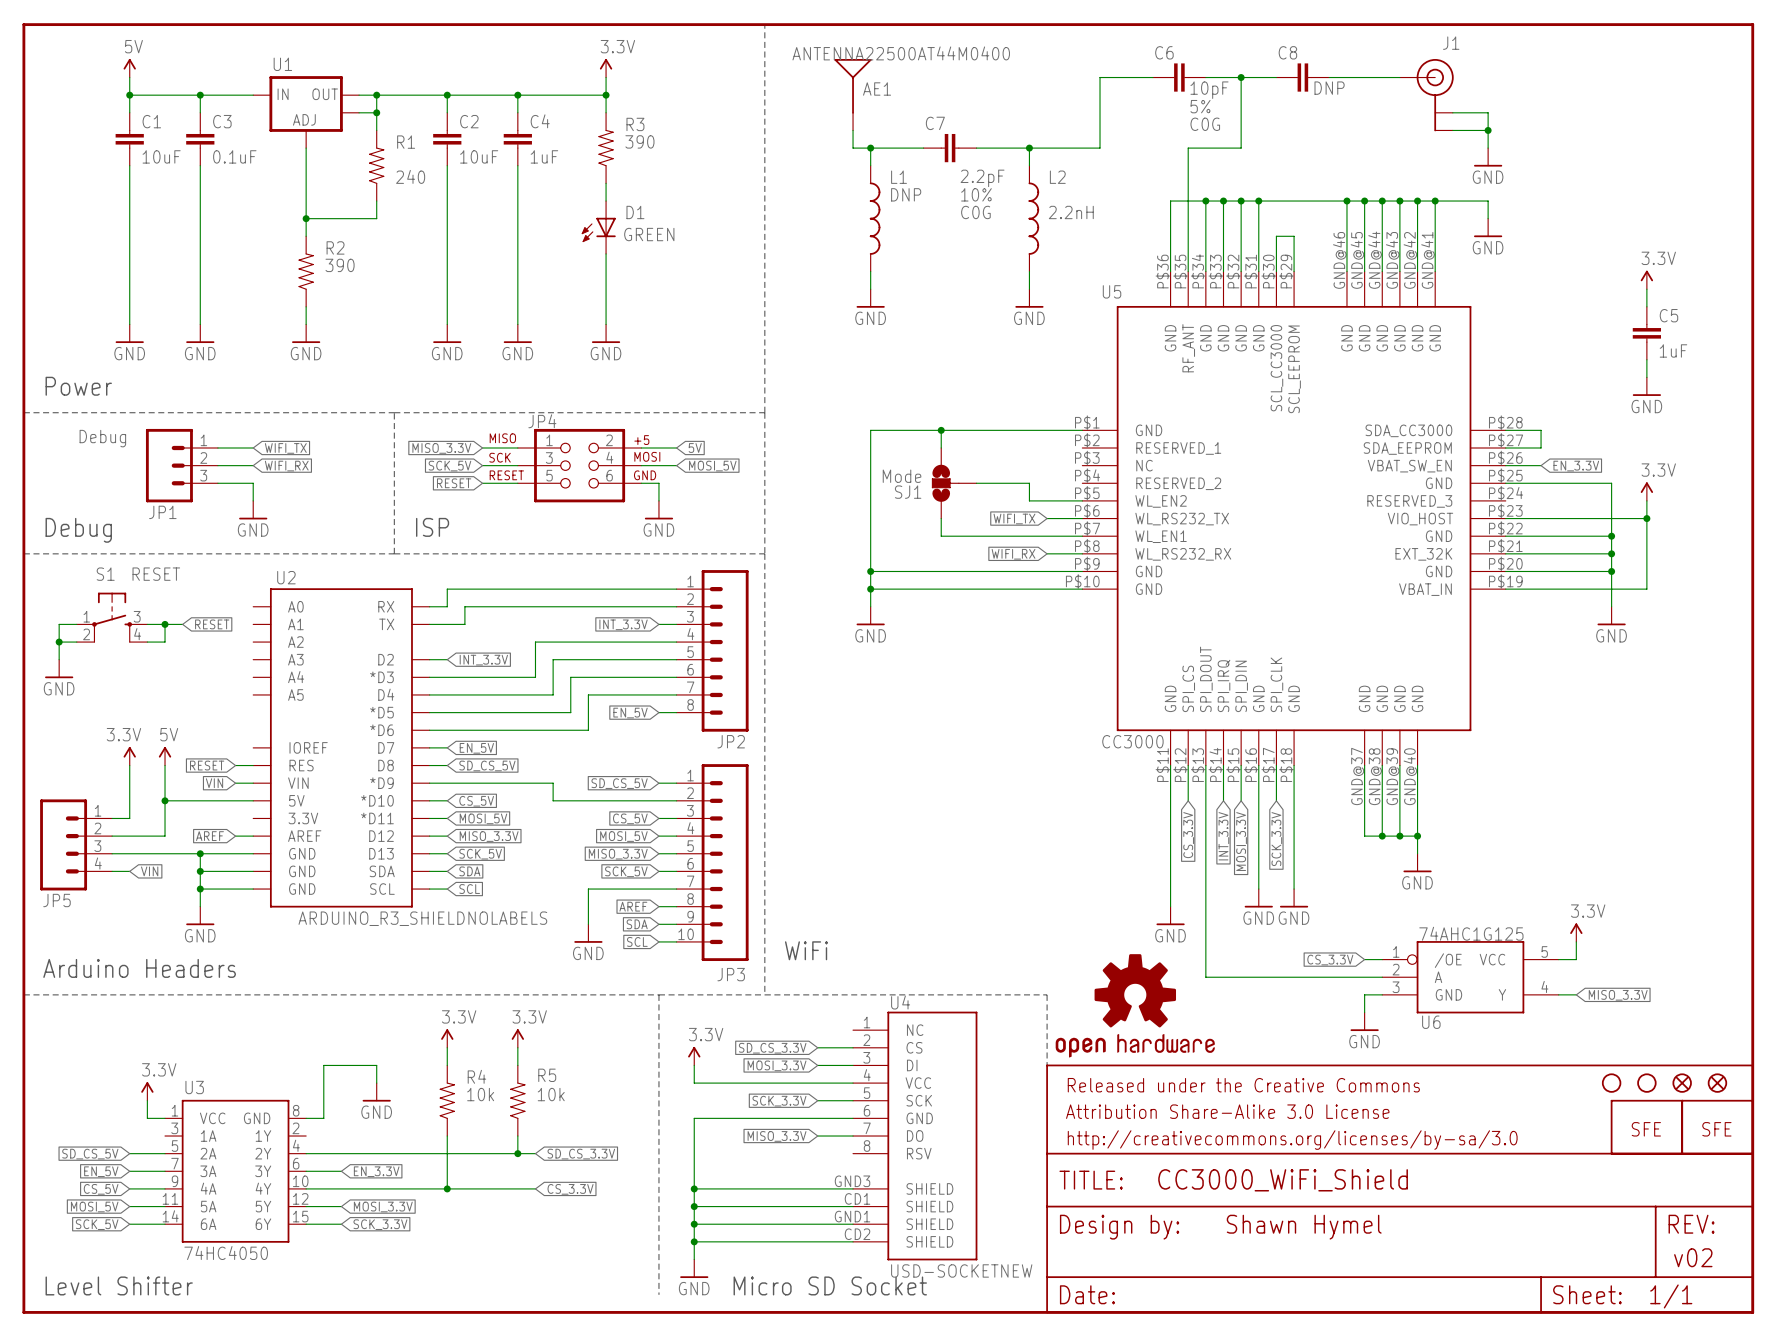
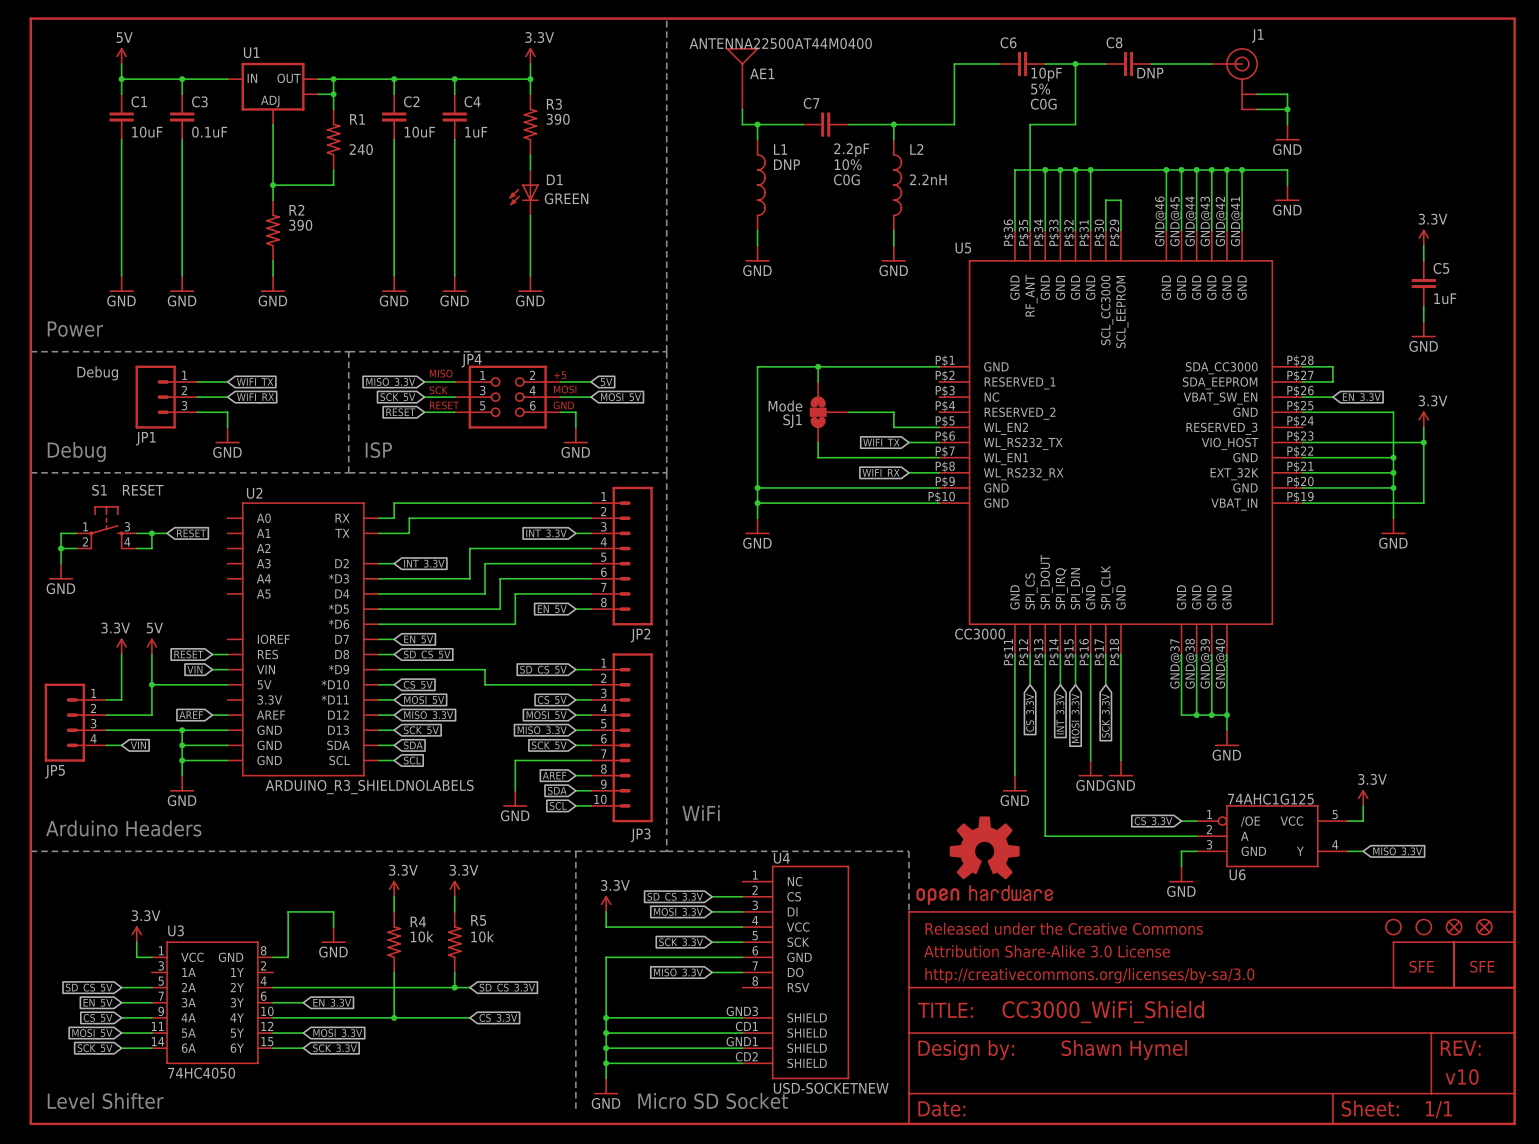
text: v02 (1693, 1257) -> v10 (1462, 1076)

